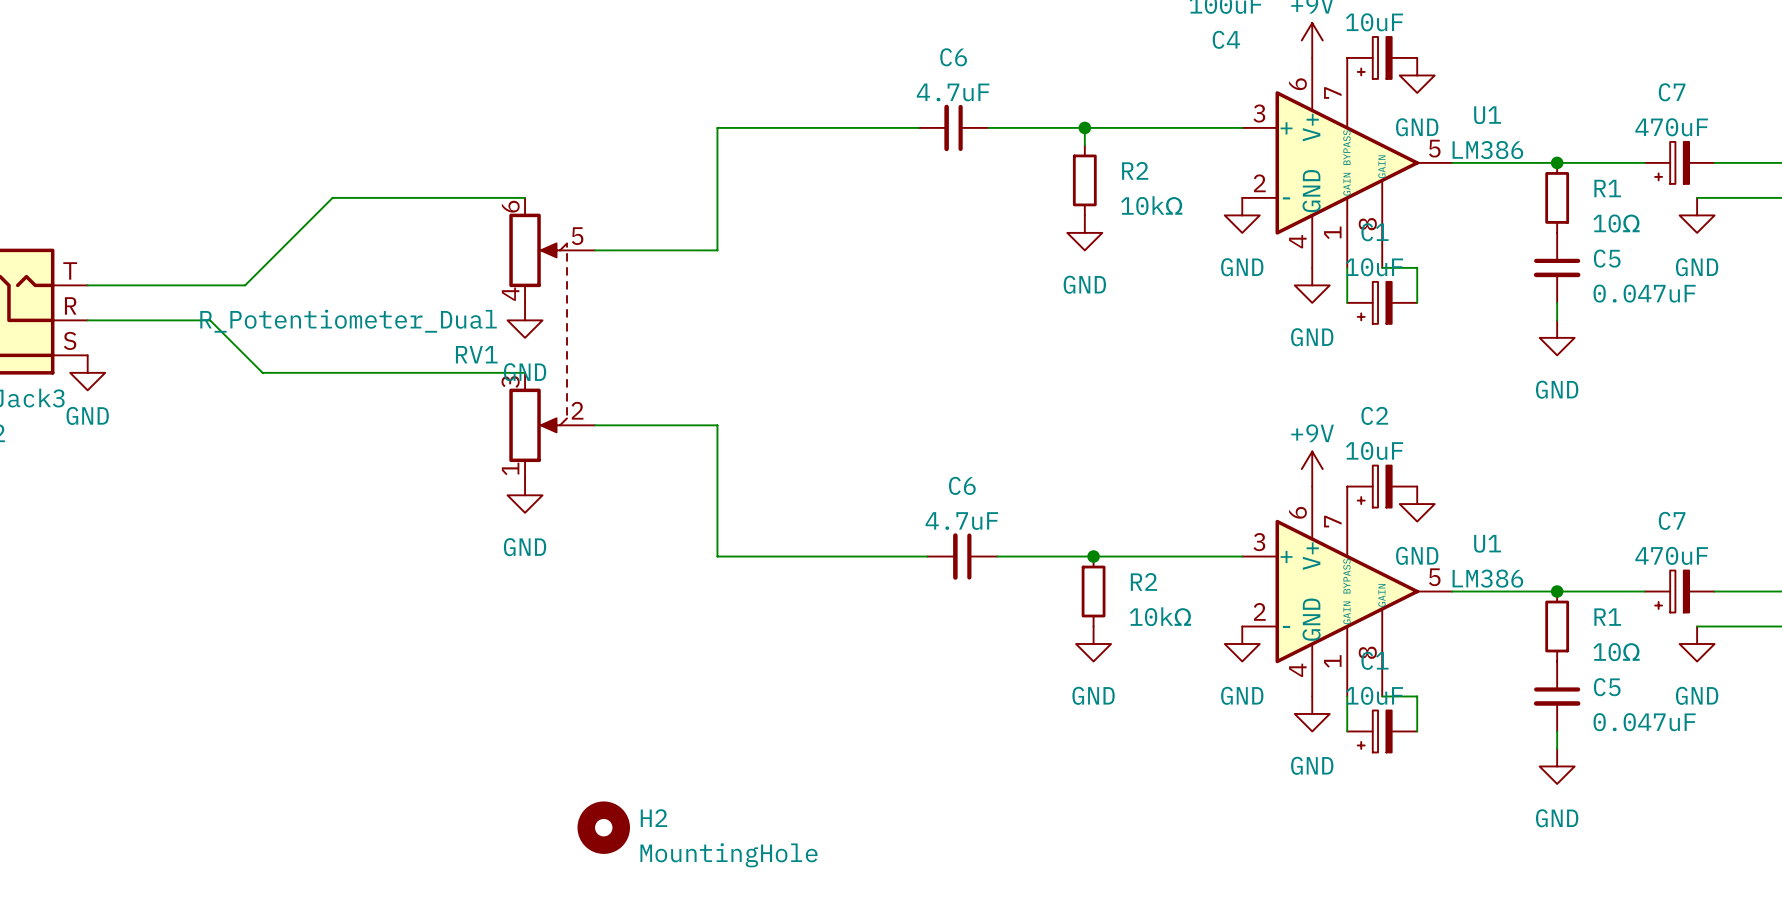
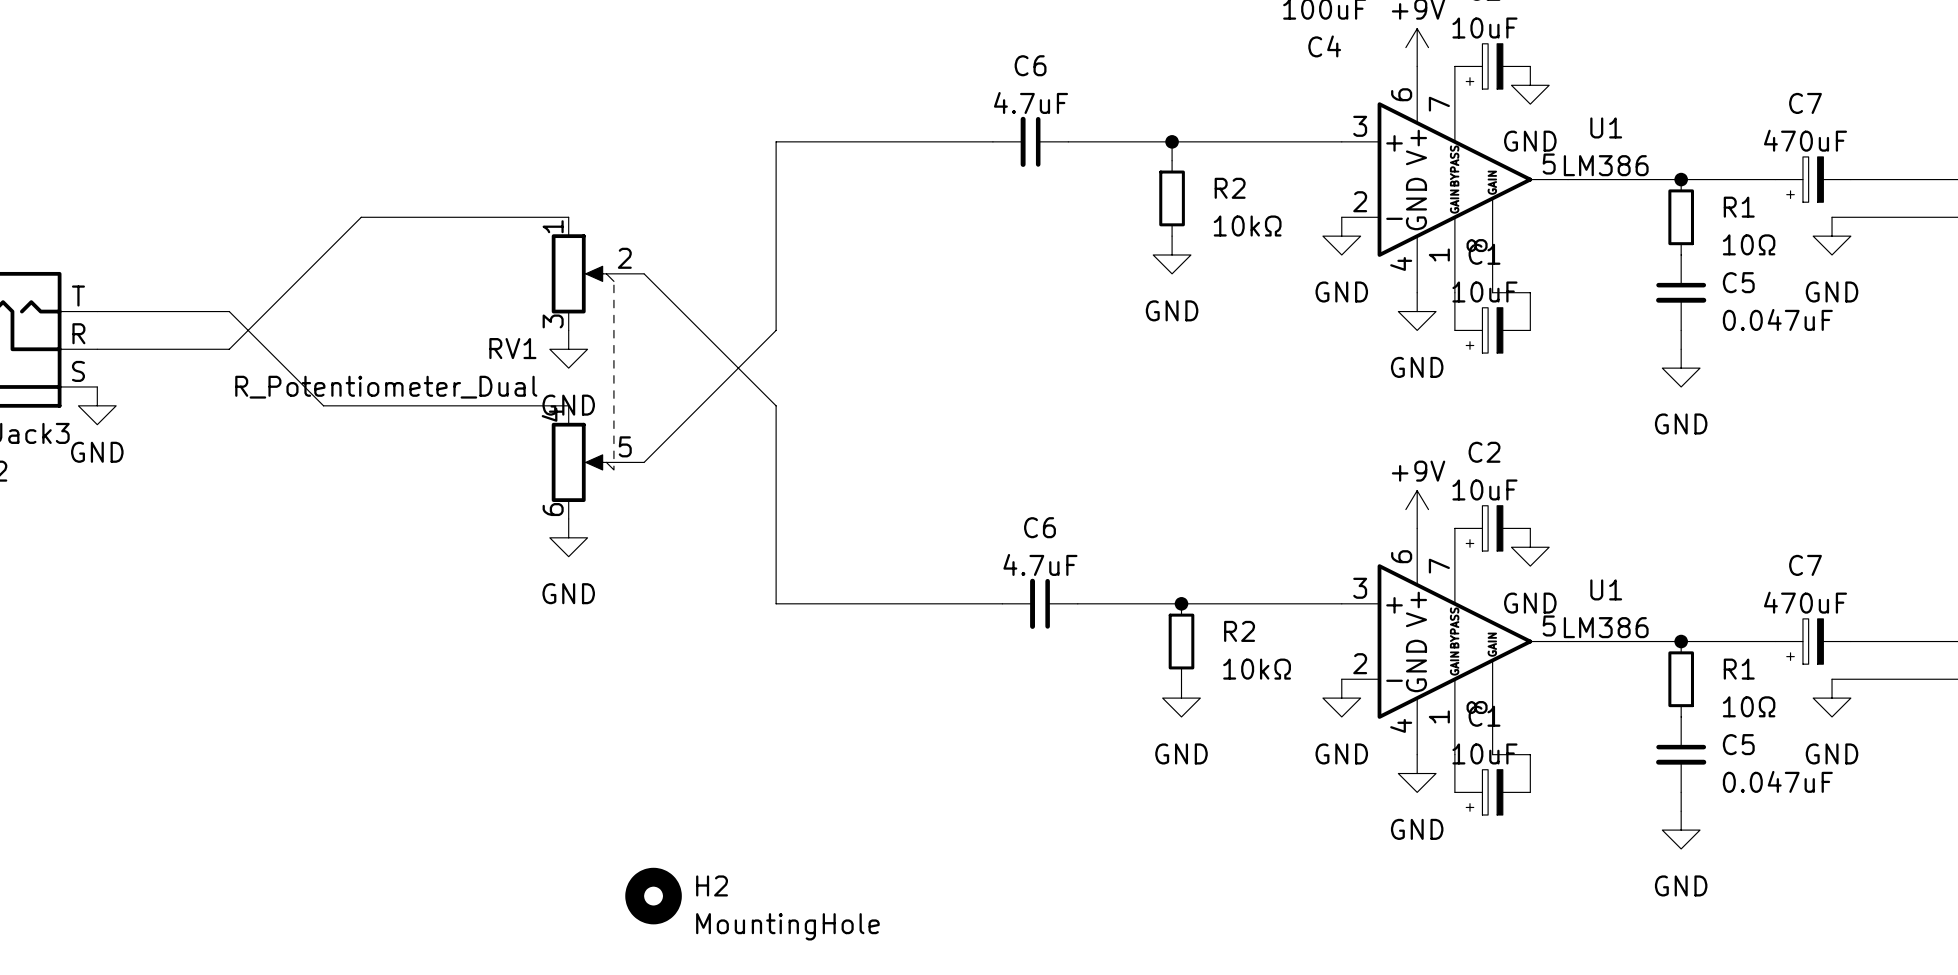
wire: (595, 250) (717, 250) -> (644, 273) (776, 405) (776, 462)
wire: (210, 285) (245, 285) -> (229, 349) (267, 311)
wire: (210, 320) (262, 372) (297, 372) -> (229, 311) (323, 405)
RV1 flip: as is (538, 337) -> up-down (582, 368)
wire: (595, 425) (717, 425) -> (644, 462) (776, 330) (776, 273)

